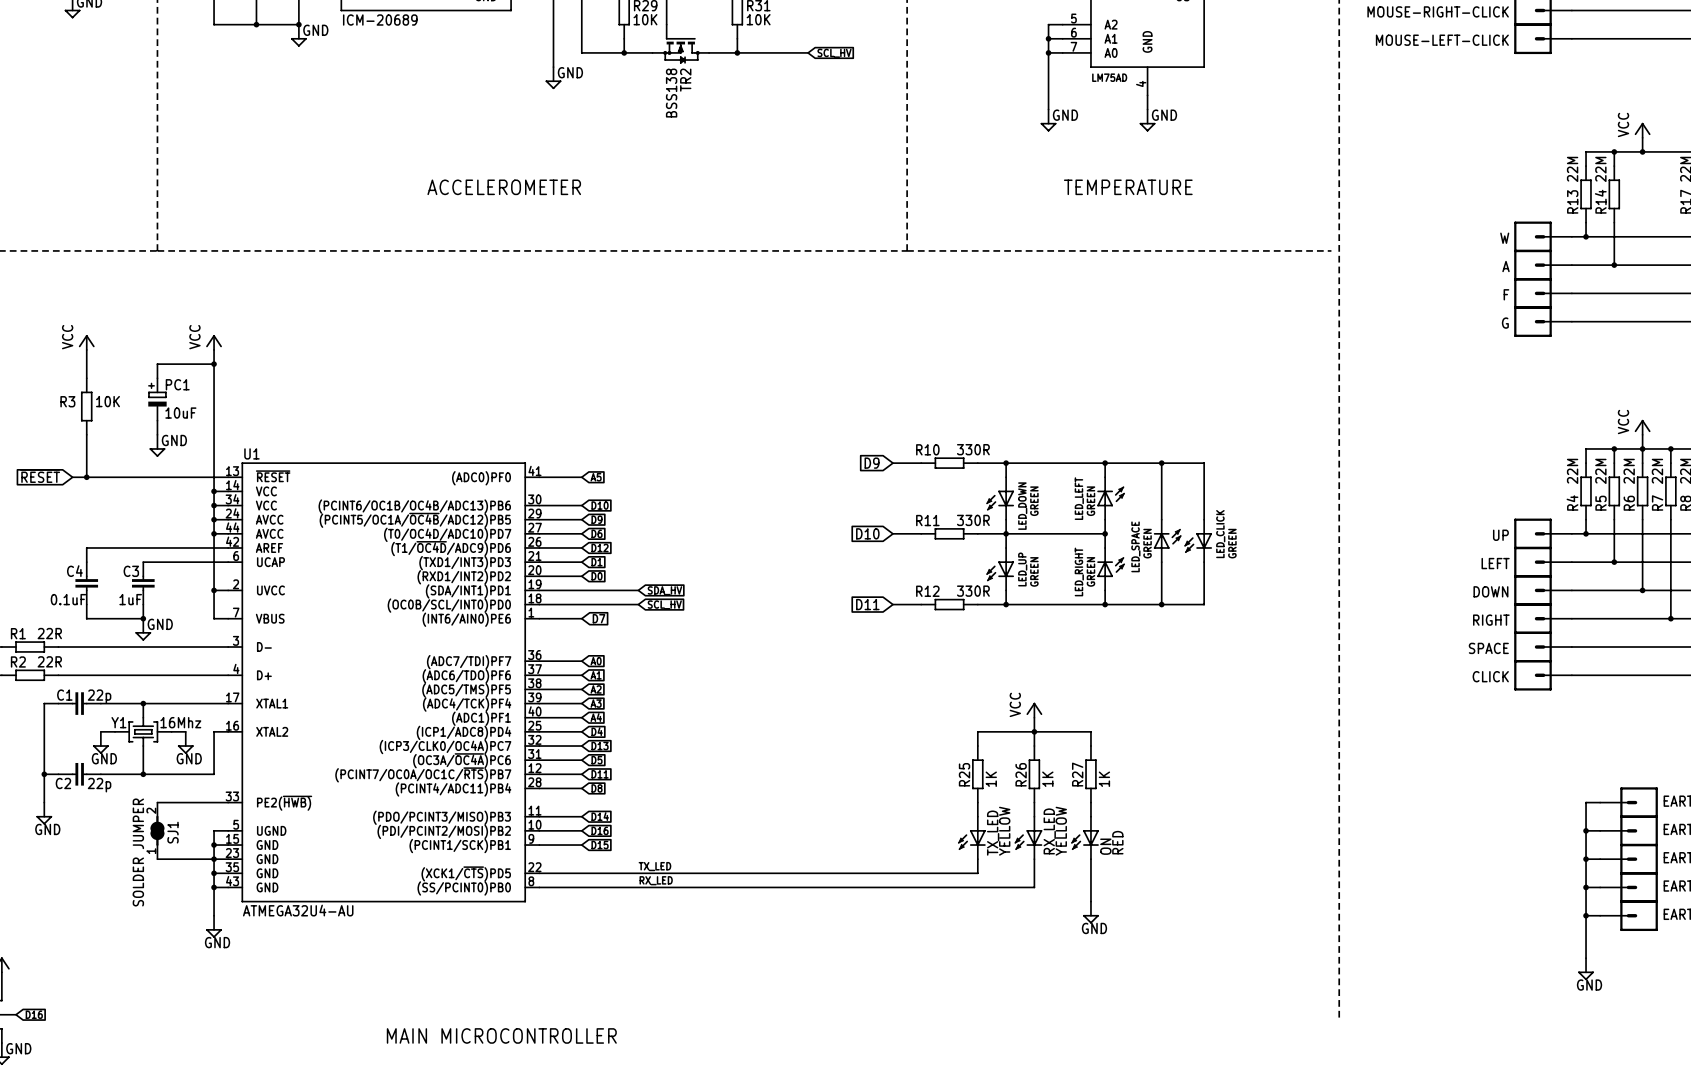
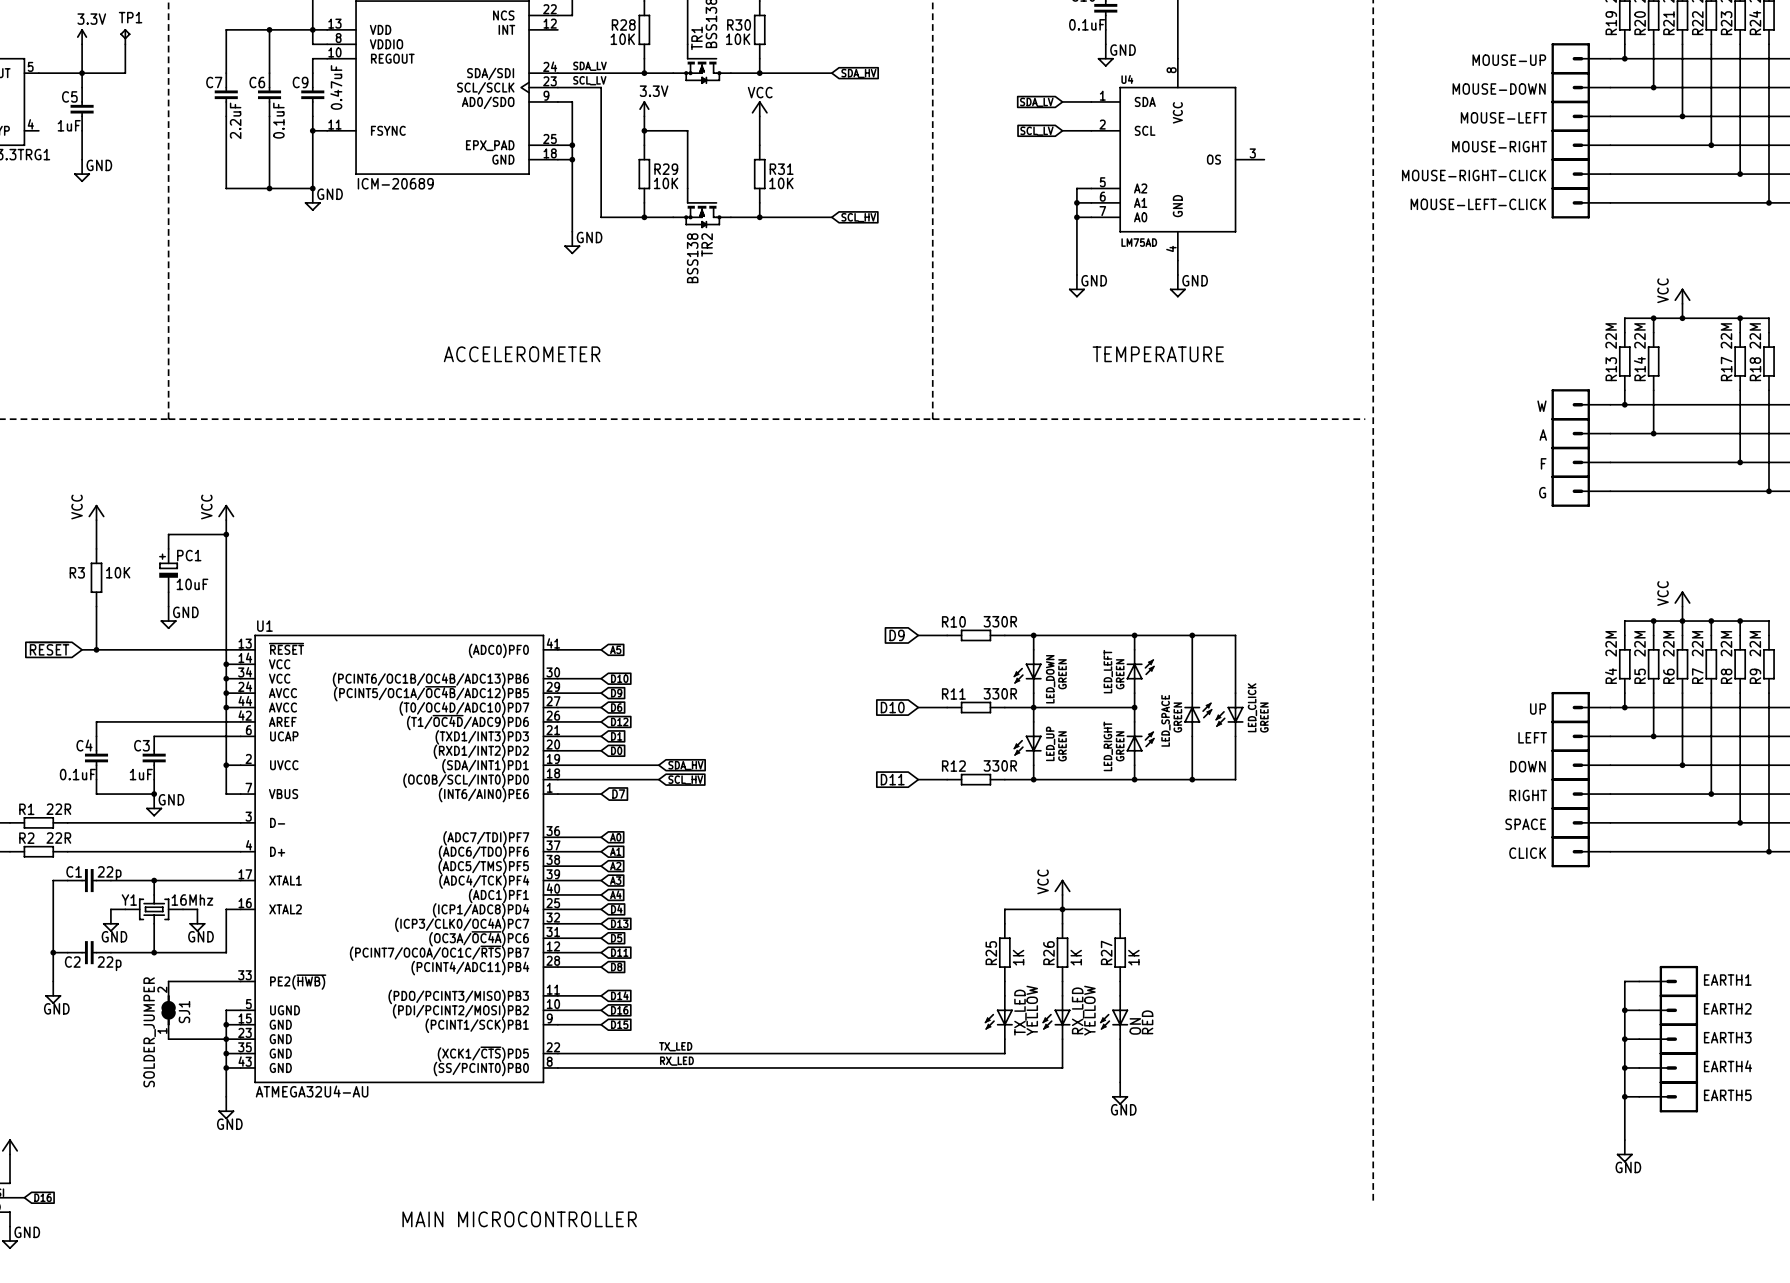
SJ1 value: SOLDER JUMPER (138, 852) -> SOLDER_JUMPER (149, 1032)

